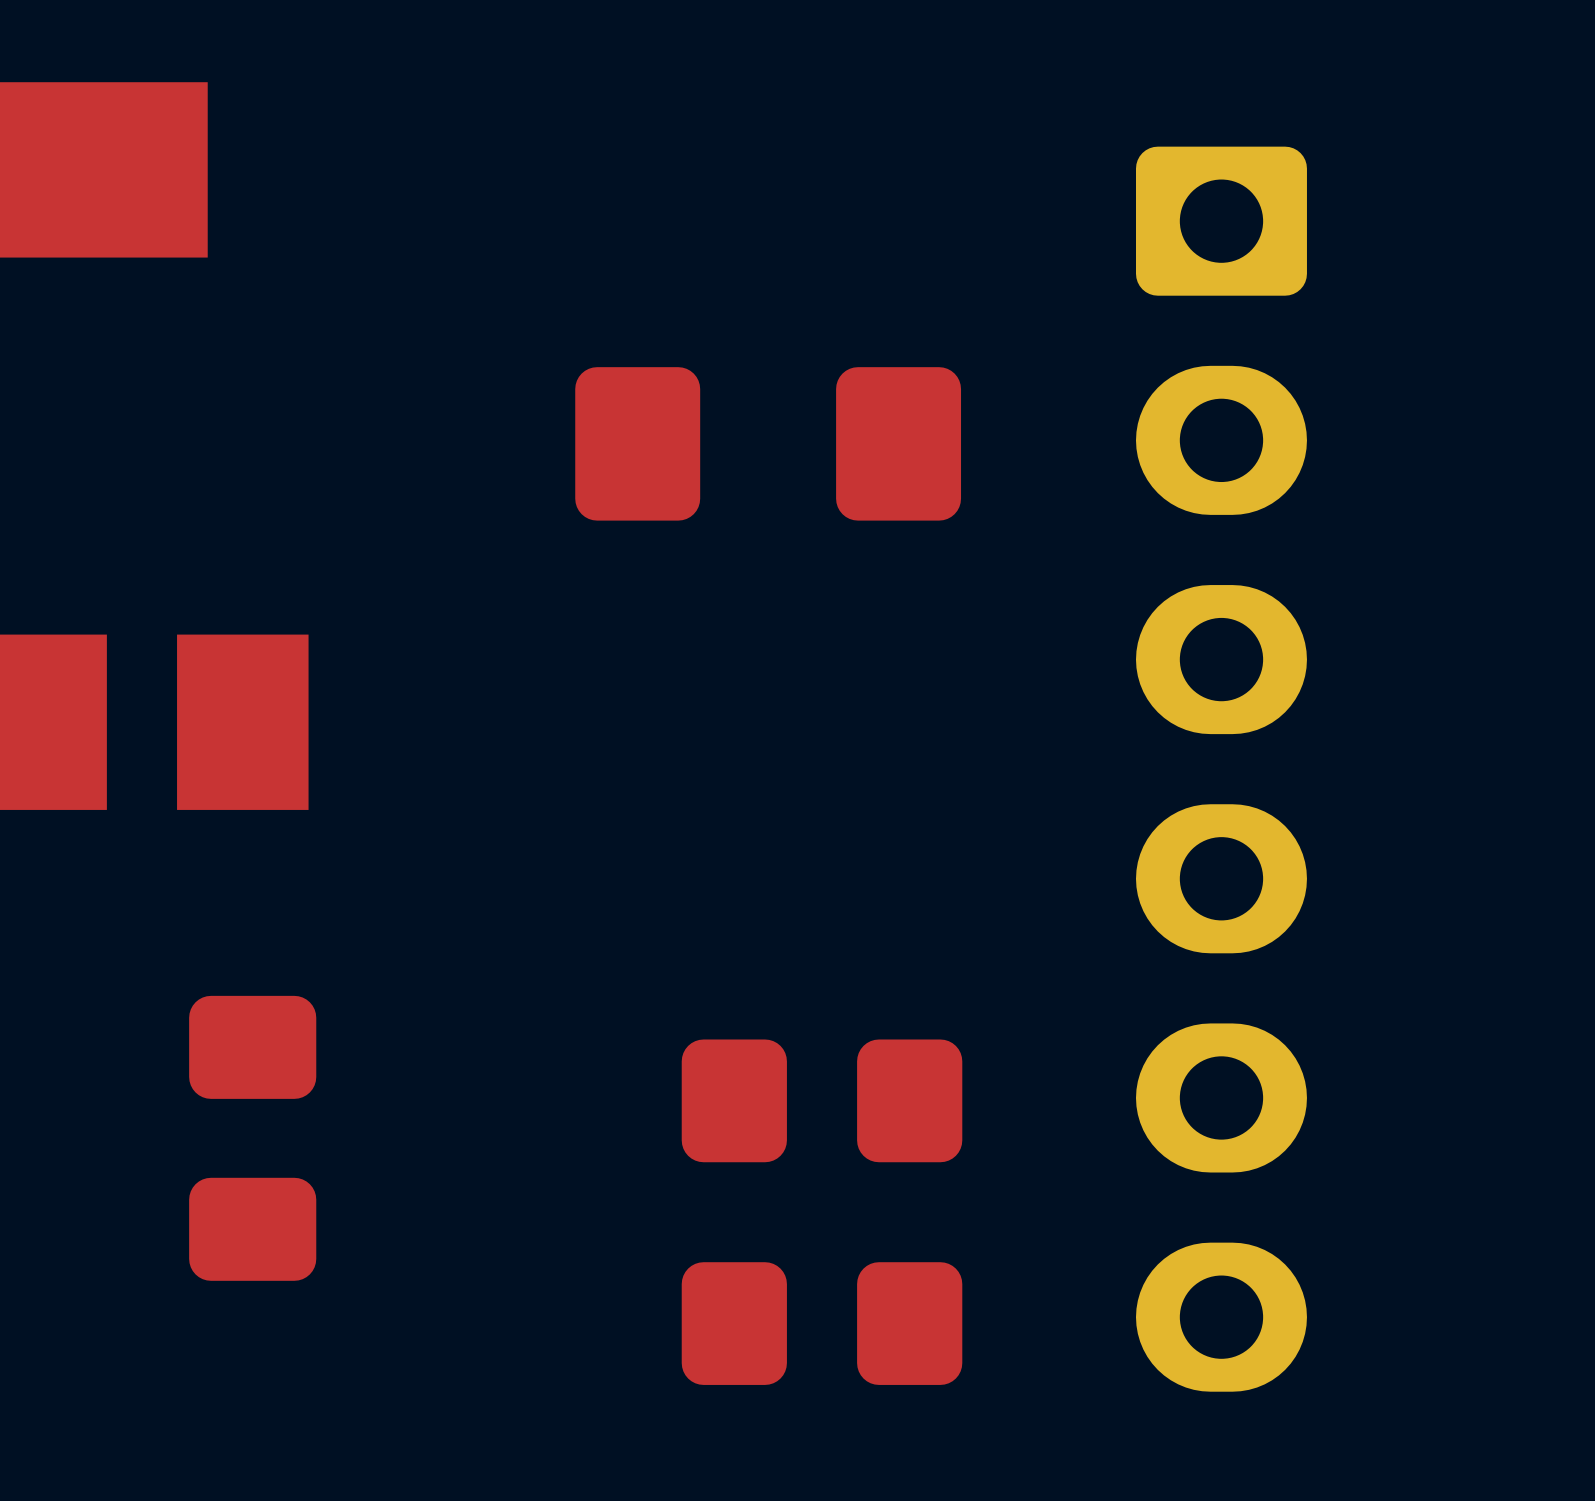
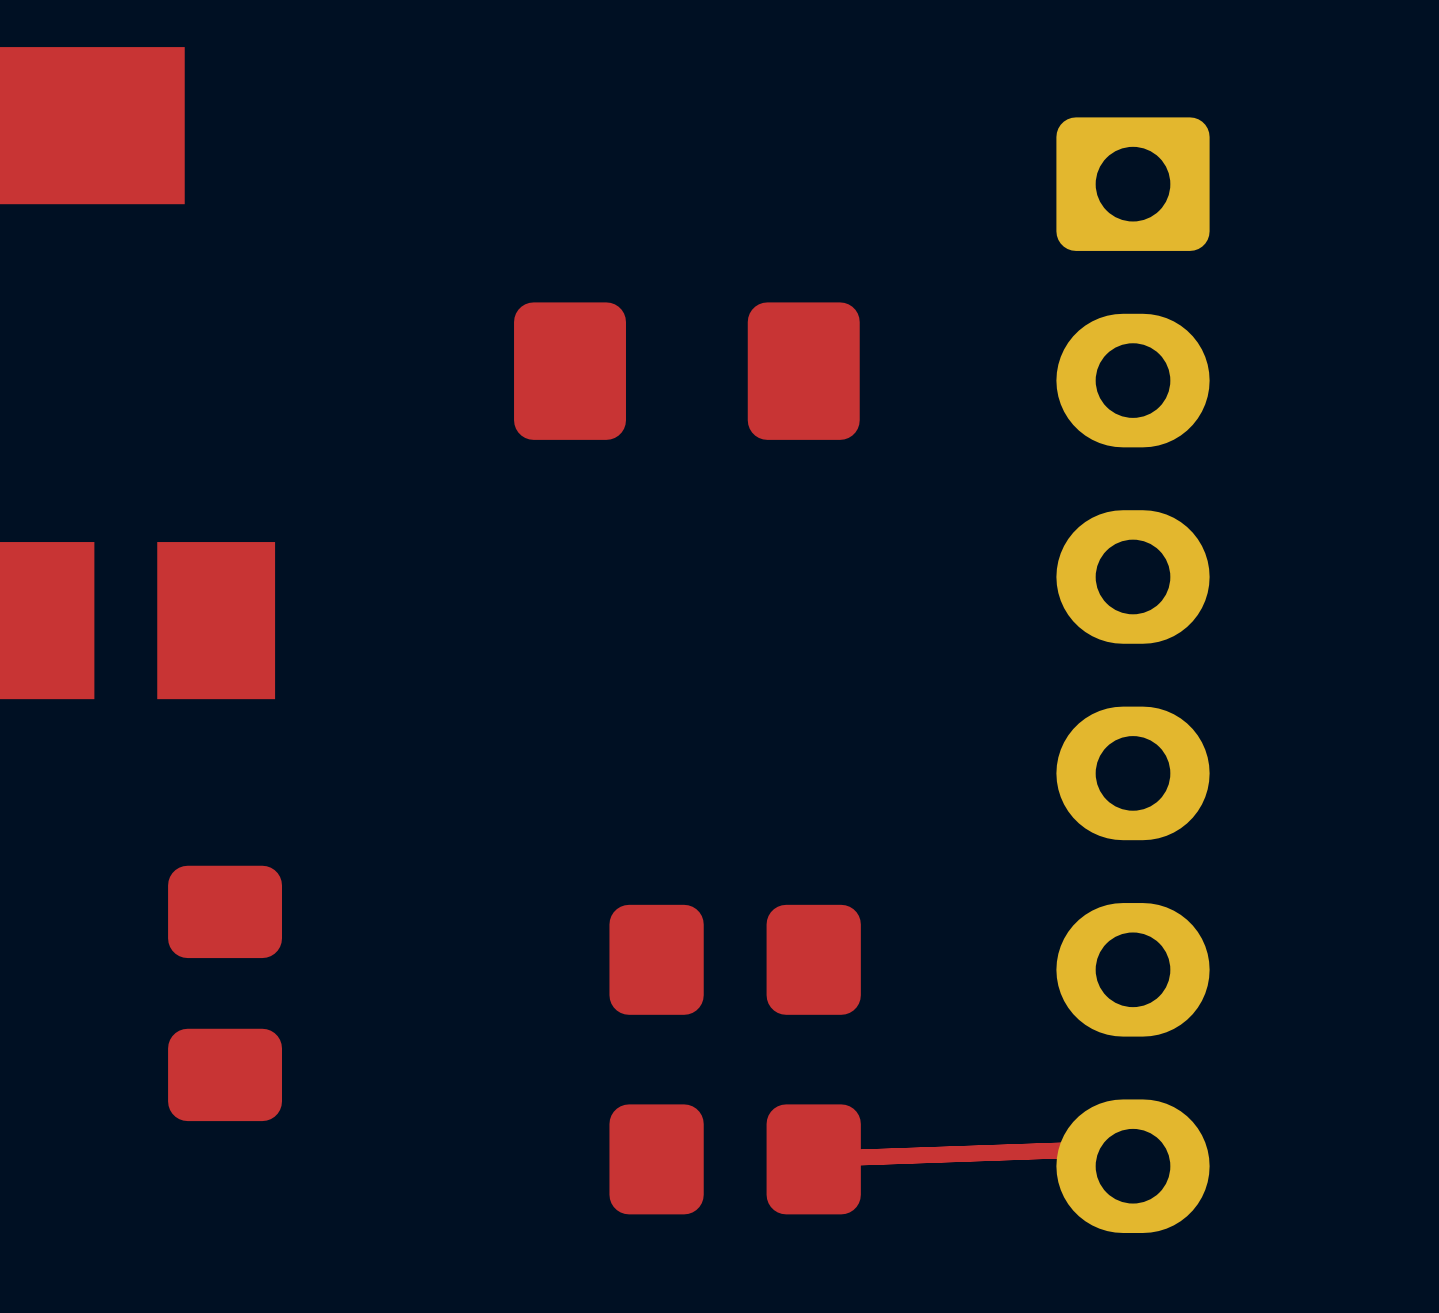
part position: (1221, 769) -> (1133, 675)
top track: none -> (1093, 1149) (803, 1159)

